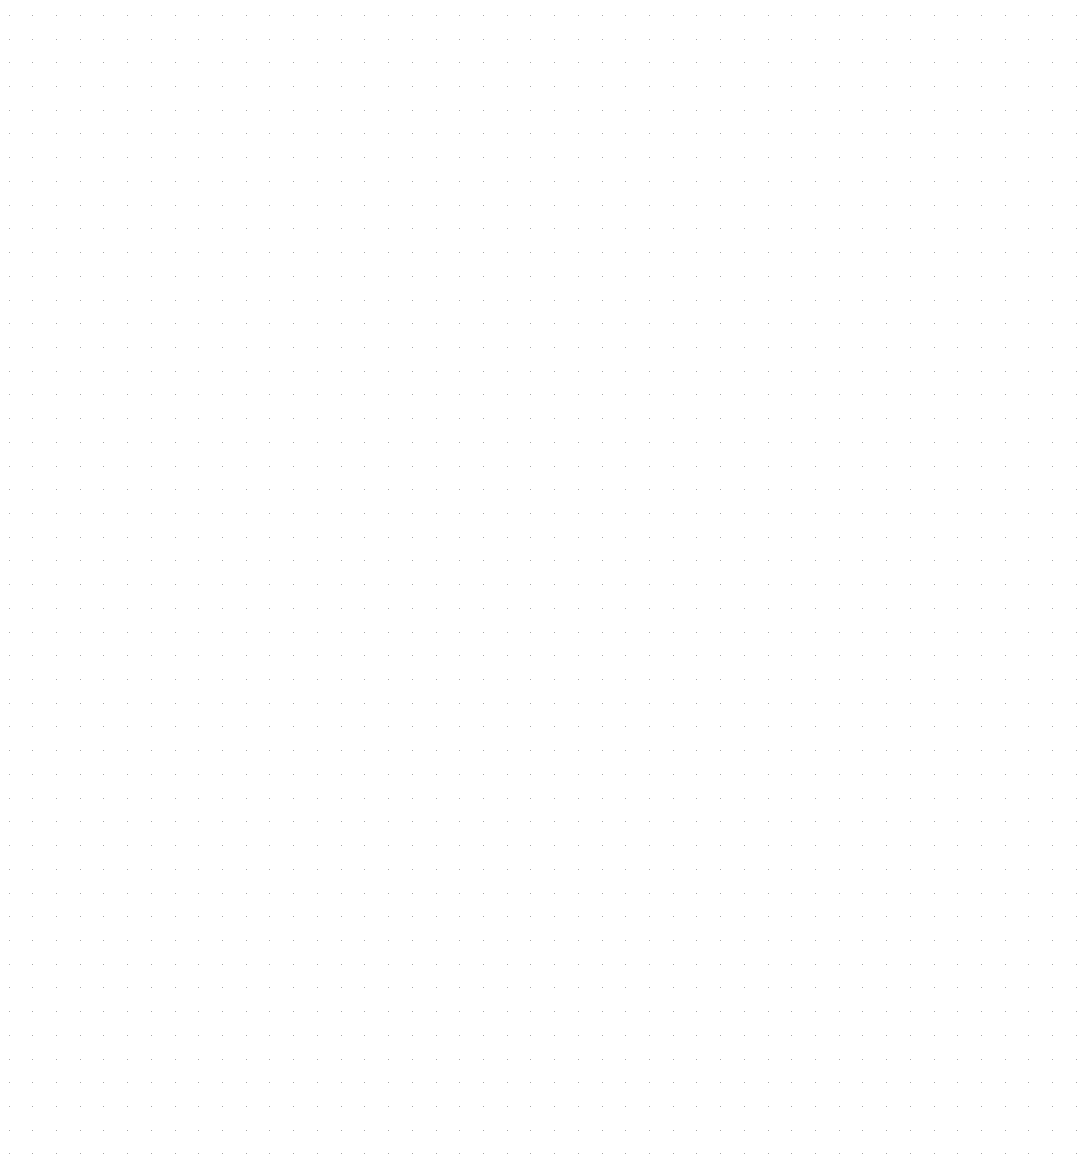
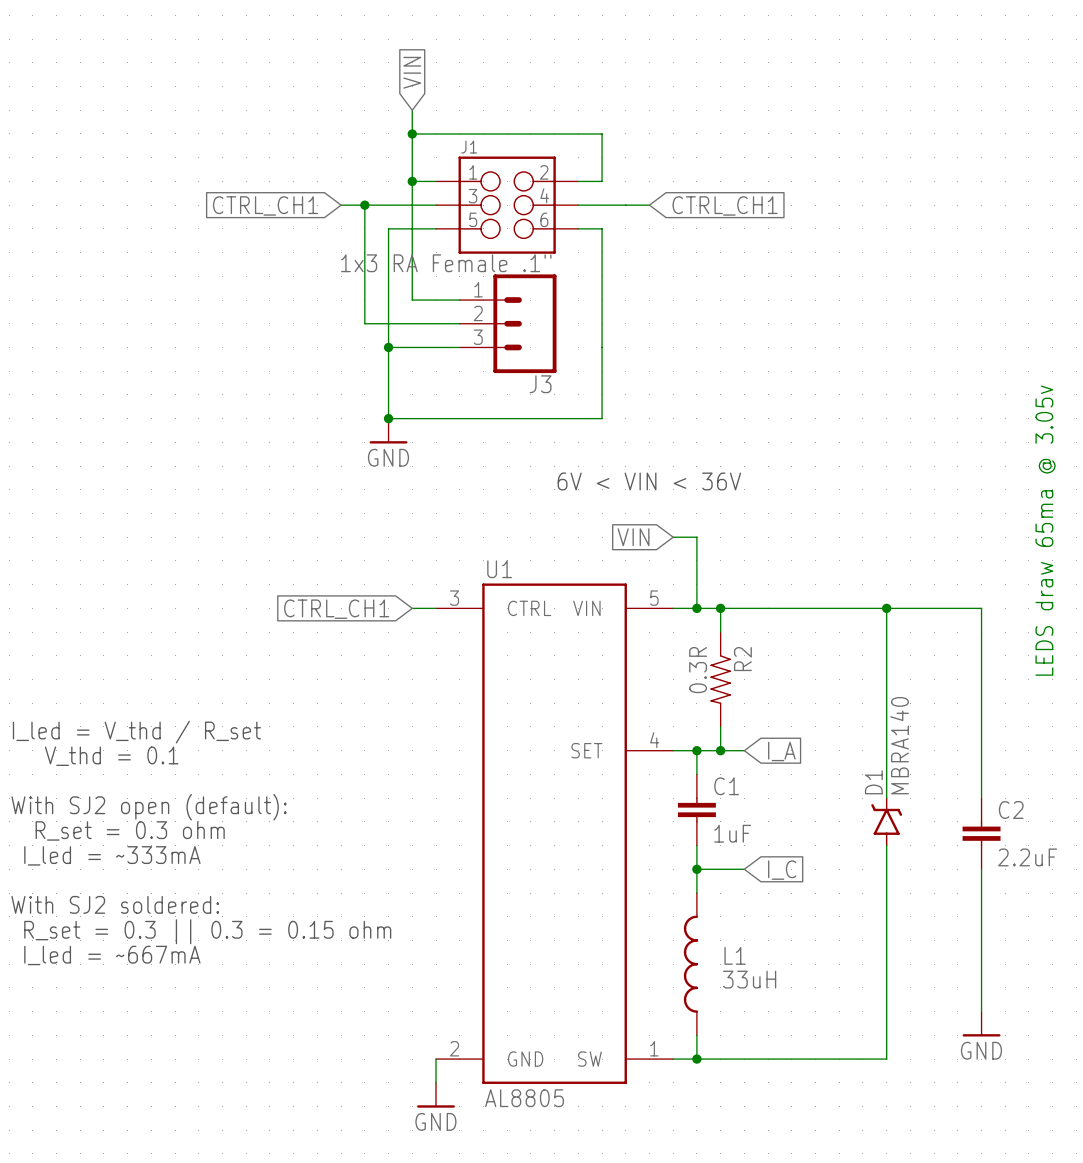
global label: none -> VIN (412, 72)
wire: none -> (412, 110) (412, 300) (459, 300)
wire: none -> (412, 133) (602, 133) (602, 181) (578, 181)
junction: none -> (412, 133)
wire: none -> (412, 181) (436, 181)
junction: none -> (412, 181)
global label: none -> CTRL_CH1 (265, 205)
wire: none -> (341, 205) (436, 205)
wire: none -> (364, 205) (364, 323) (459, 323)
junction: none -> (364, 205)
J1: none -> (507, 205)
wire: none -> (578, 205) (649, 205)
global label: none -> CTRL_CH1 (725, 205)
wire: none -> (436, 228) (388, 228) (388, 418) (602, 418) (602, 228) (578, 228)
J3: none -> 1x3 RA Female .1" (508, 323)
wire: none -> (388, 347) (459, 347)
junction: none -> (388, 347)
junction: none -> (388, 418)
power symbol: none -> GND (388, 431)
text: none -> 6V < VIN < 36V (649, 481)
text: none -> LEDS draw 65ma @ 3.05v (1045, 530)
global label: none -> VIN (633, 537)
wire: none -> (673, 537) (696, 537) (696, 608)
wire: none -> (412, 608) (436, 608)
wire: none -> (673, 608) (981, 608) (981, 798)
junction: none -> (696, 608)
wire: none -> (720, 608) (720, 632)
junction: none -> (720, 608)
wire: none -> (886, 608) (886, 798)
junction: none -> (886, 608)
global label: none -> CTRL_CH1 (336, 609)
R2: none -> 0.3R (720, 679)
wire: none -> (720, 726) (720, 750)
text: none -> I_led = V_thd / R_set (136, 732)
wire: none -> (673, 750) (744, 750)
wire: none -> (696, 750) (696, 774)
junction: none -> (696, 750)
junction: none -> (720, 750)
global label: none -> I_A (781, 751)
text: none -> V_thd = 0.1 (111, 756)
text: none -> With SJ2 open (default): (149, 807)
C1: none -> 1uF (696, 809)
D1: none -> MBRA140 (886, 821)
text: none -> R_set = 0.3 ohm (130, 830)
U1: none -> AL8805 (554, 833)
C2: none -> 2.2uF (981, 833)
wire: none -> (696, 845) (696, 893)
wire: none -> (886, 845) (886, 1059) (673, 1059)
text: none -> I_led = ~333mA (112, 855)
wire: none -> (696, 869) (744, 869)
junction: none -> (696, 869)
wire: none -> (981, 869) (981, 1011)
global label: none -> I_C (782, 870)
text: none -> With SJ2 soldered: (115, 904)
text: none -> R_set = 0.3 || 0.3 = 0.15 ohm (207, 931)
text: none -> I_led = ~667mA (112, 955)
L1: none -> 33uH (690, 964)
power symbol: none -> GND (981, 1024)
wire: none -> (696, 1035) (696, 1059)
wire: none -> (436, 1059) (436, 1082)
junction: none -> (696, 1059)
power symbol: none -> GND (436, 1095)

